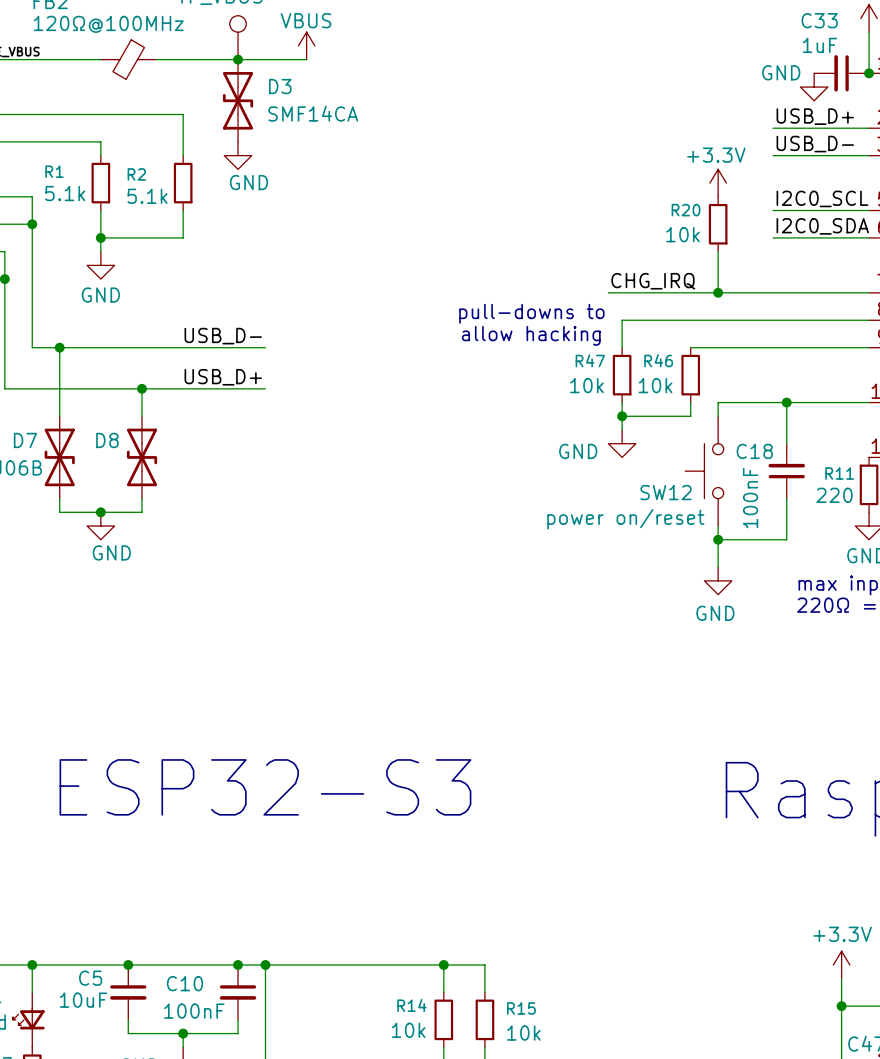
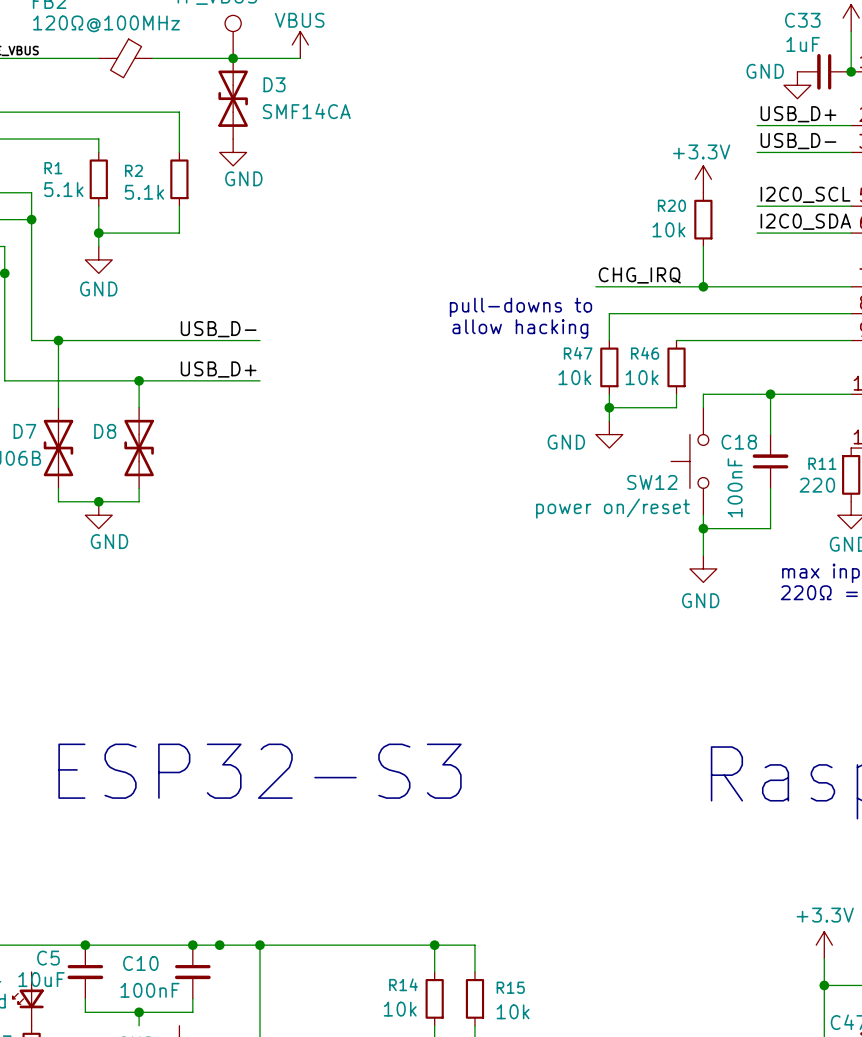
wire: (32, 964) (32, 992) -> none
junction: (32, 964) -> none
junction: none -> (85, 945)
junction: (128, 964) -> none
junction: none -> (192, 945)
junction position: (238, 964) -> (219, 945)
C5 position: (128, 992) -> (85, 972)
C10 position: (238, 992) -> (192, 972)
wire: (128, 1019) (128, 1033) -> (85, 998) (85, 1012) (125, 1012)
wire: (238, 1019) (238, 1033) (196, 1033) -> (192, 998) (192, 1012)
junction: none -> (139, 1012)
wire: (183, 1033) (183, 1047) -> (139, 1012) (139, 1025)
junction: (183, 1033) -> none

